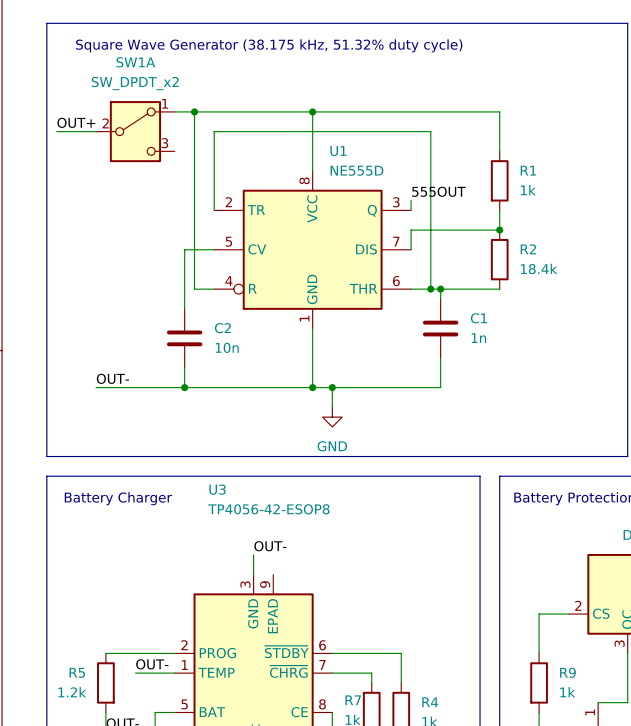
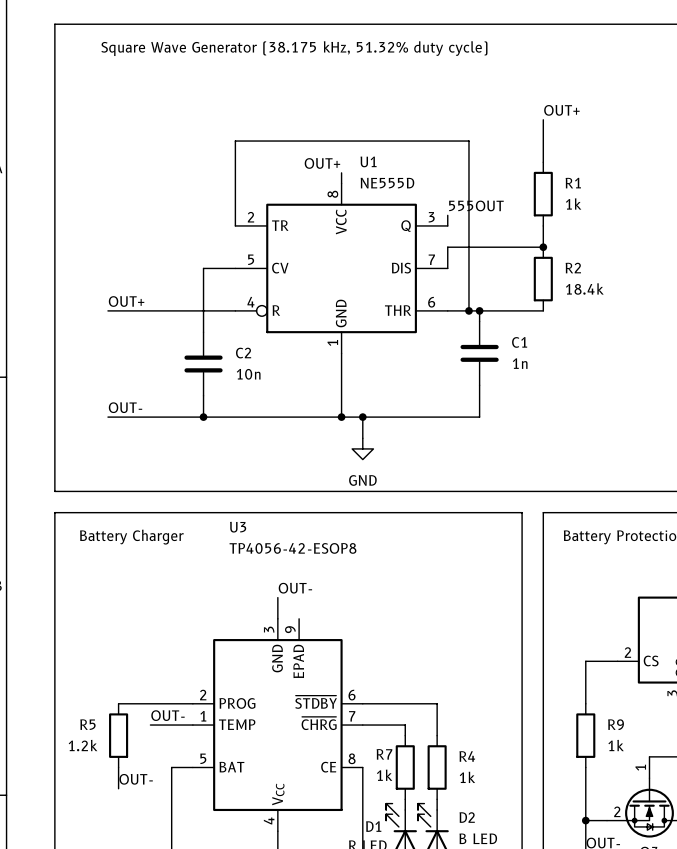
label: none -> OUT+ (561, 110)
wire: (174, 111) (499, 111) -> none
wire: (194, 111) (194, 289) -> (107, 310) (214, 310)
junction: (194, 111) -> none
wire: (312, 111) (312, 161) -> none
junction: (312, 111) -> none
label: OUT+ (76, 122) -> none
wire: (56, 131) (96, 131) -> none
SW1A: SW_DPDT_x2 (135, 131) -> none
label: none -> OUT+ (322, 163)
label: none -> OUT+ (126, 301)

